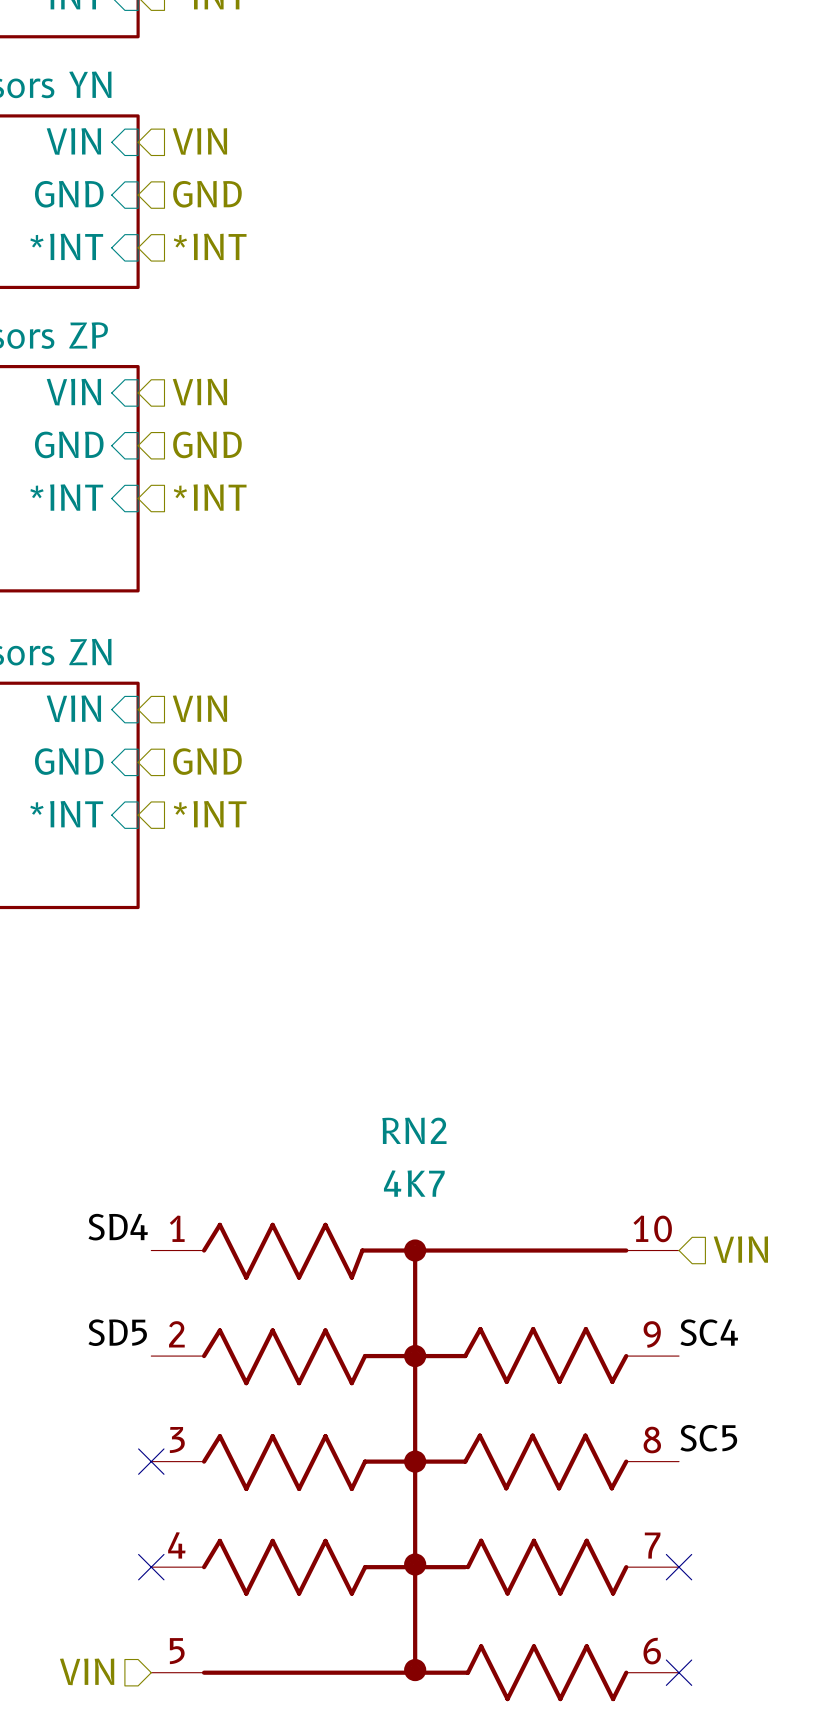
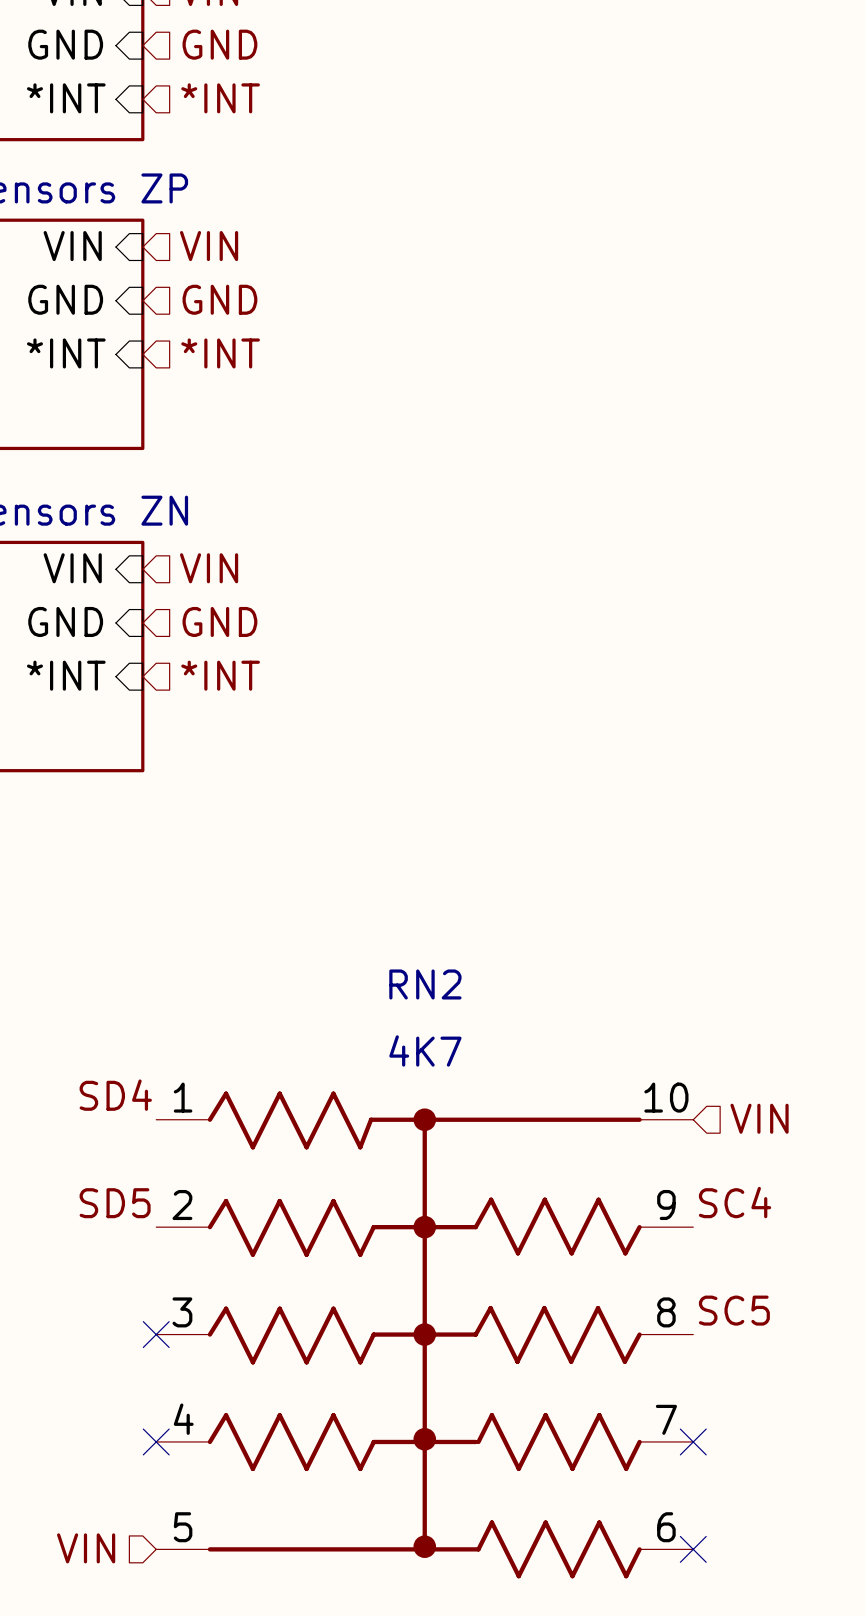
RN2 name position: RN2 (414, 1130) -> RN2 (425, 984)

